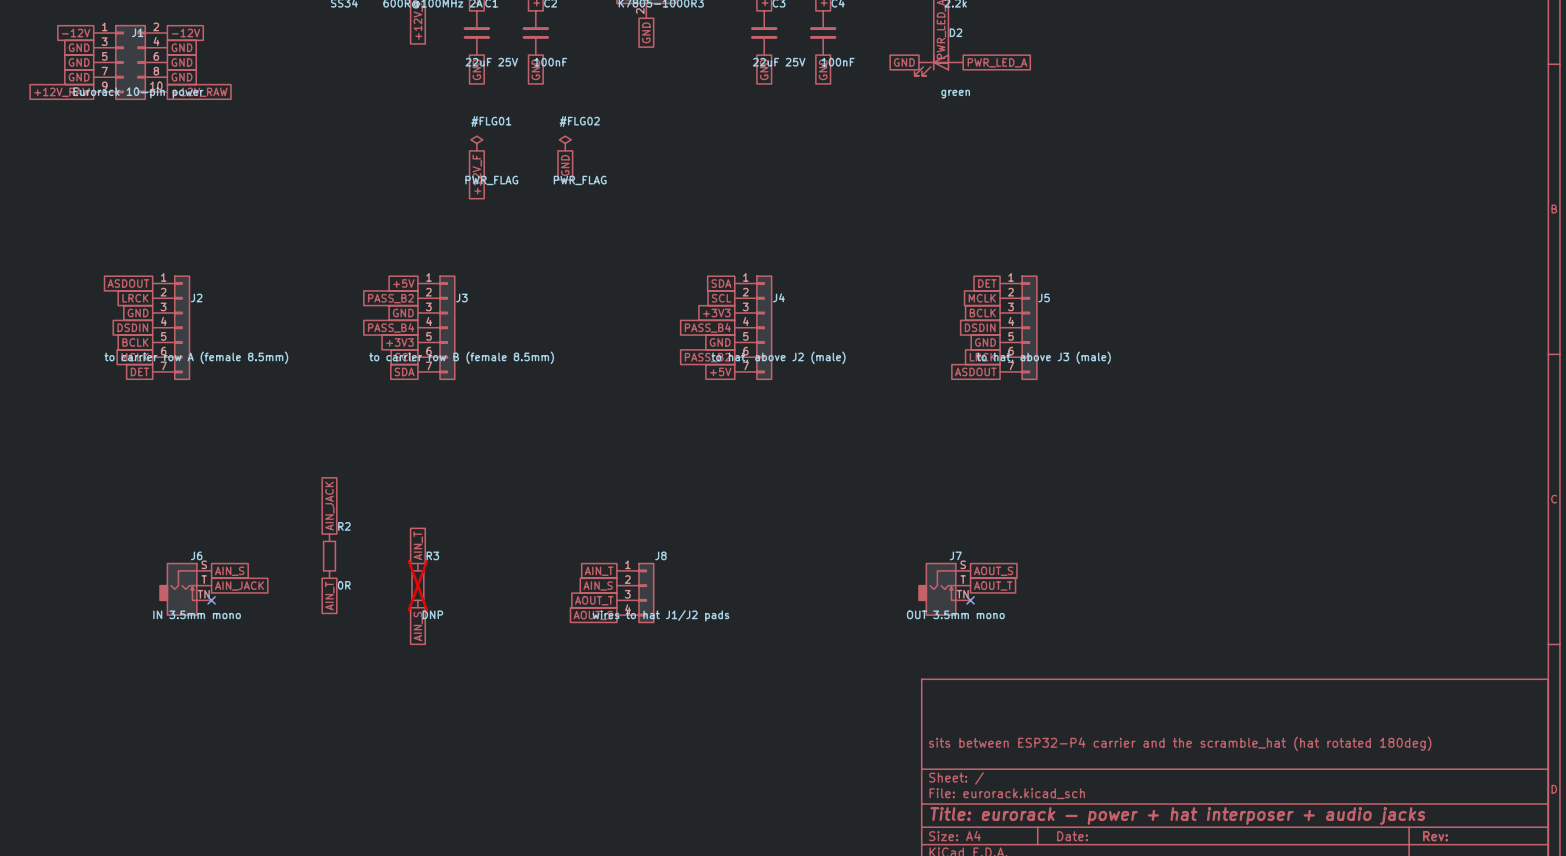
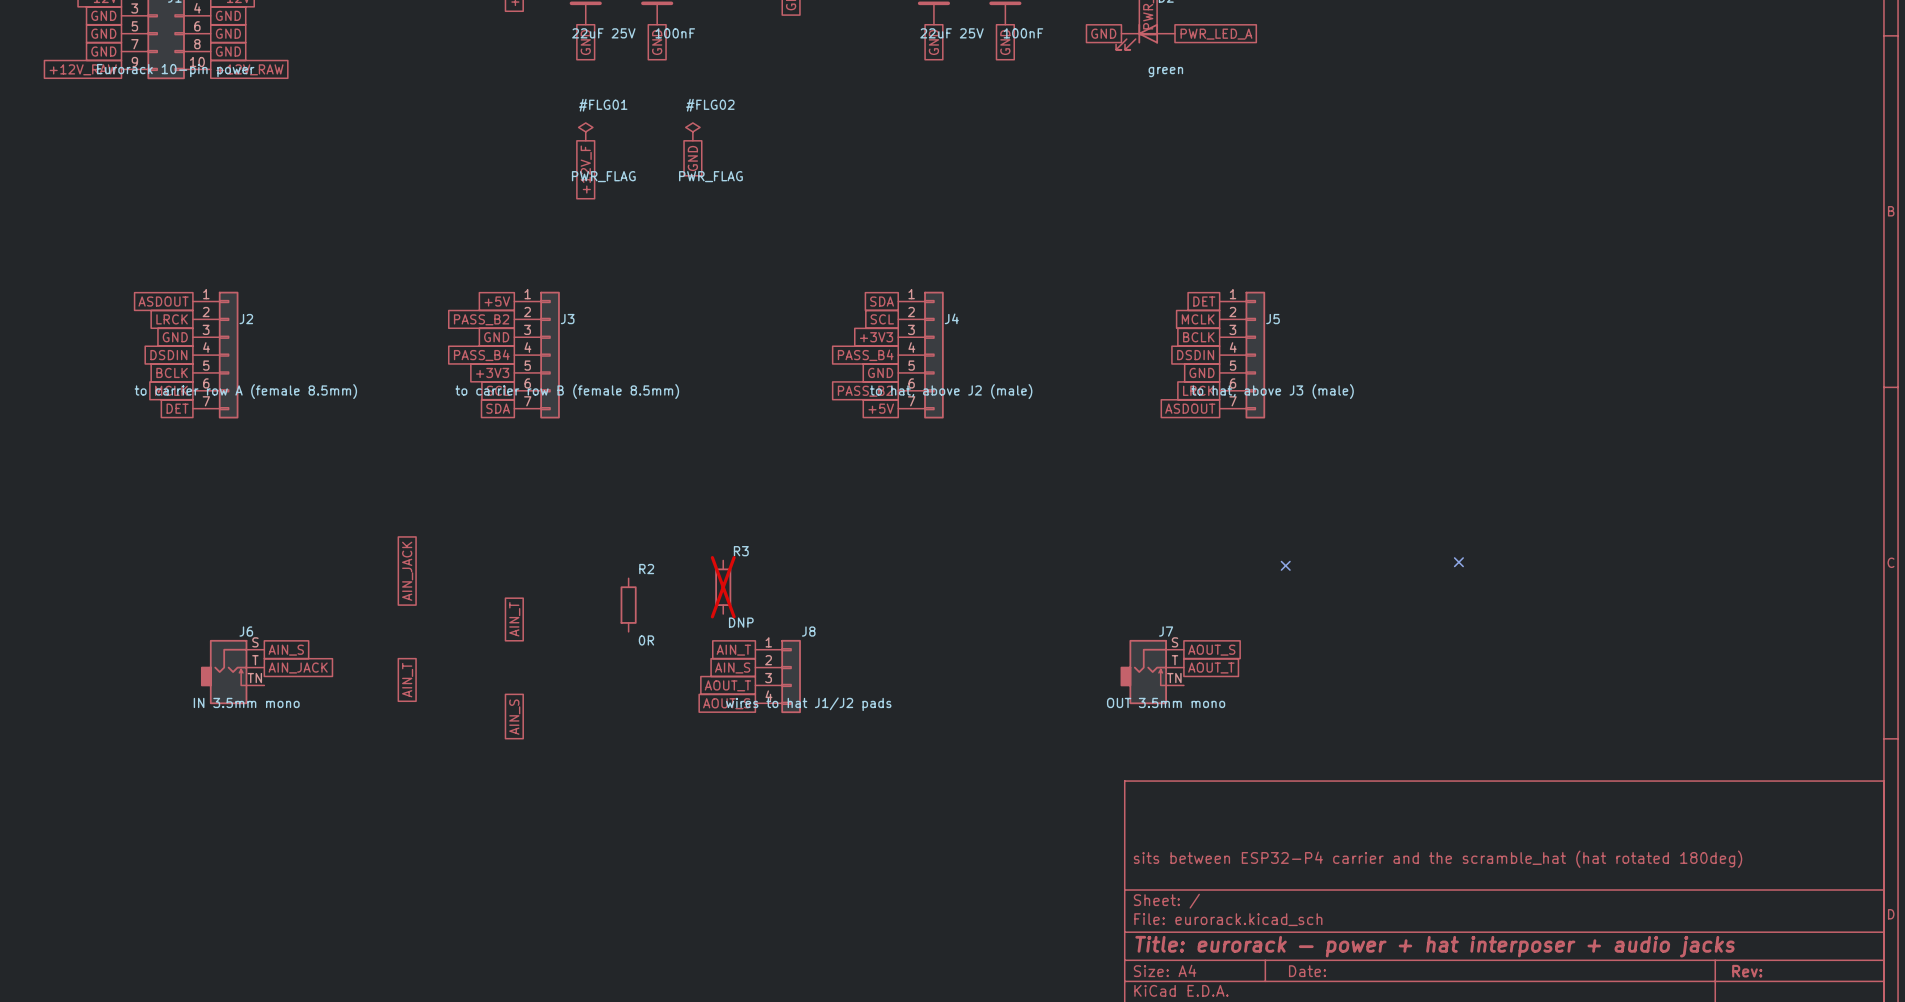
no-connect mark: none -> (1458, 562)
no-connect mark: none -> (1285, 565)
R2 position: (329, 556) -> (628, 605)
R3 position: (417, 585) -> (723, 587)
no-connect mark: (211, 600) -> none
no-connect mark: (970, 600) -> none

